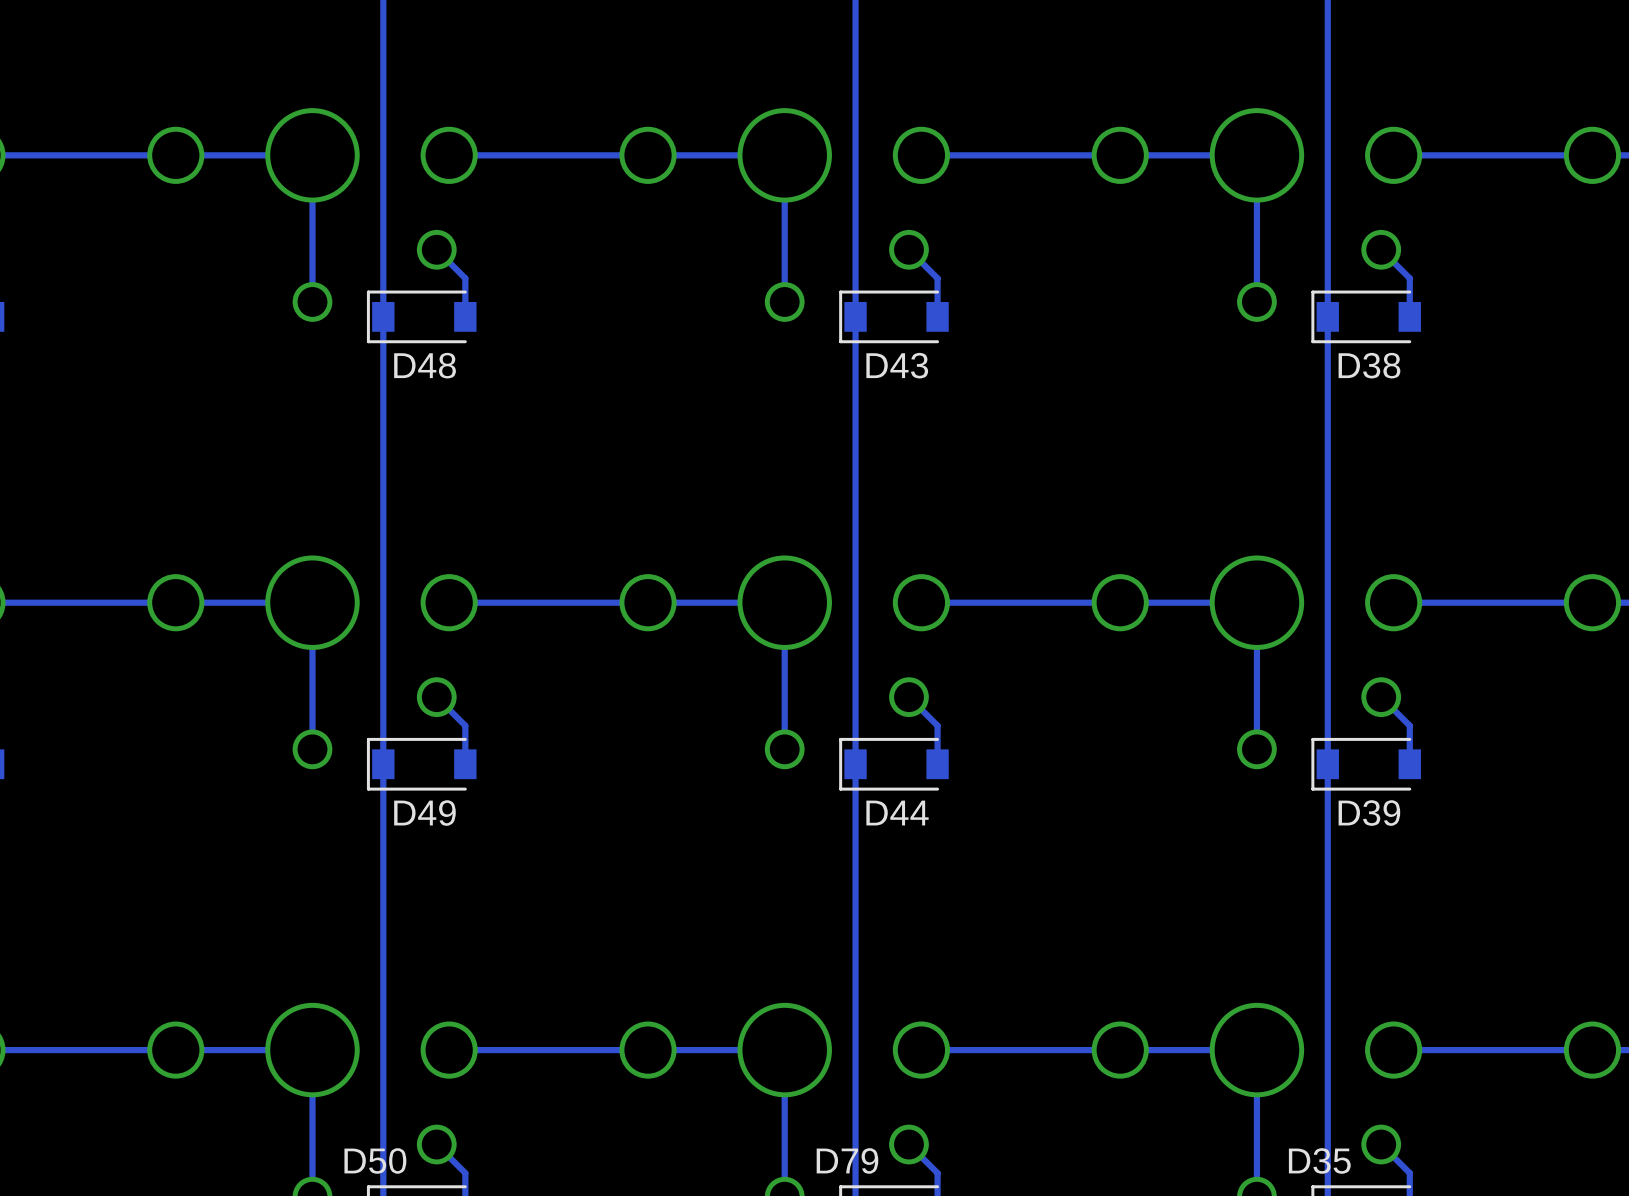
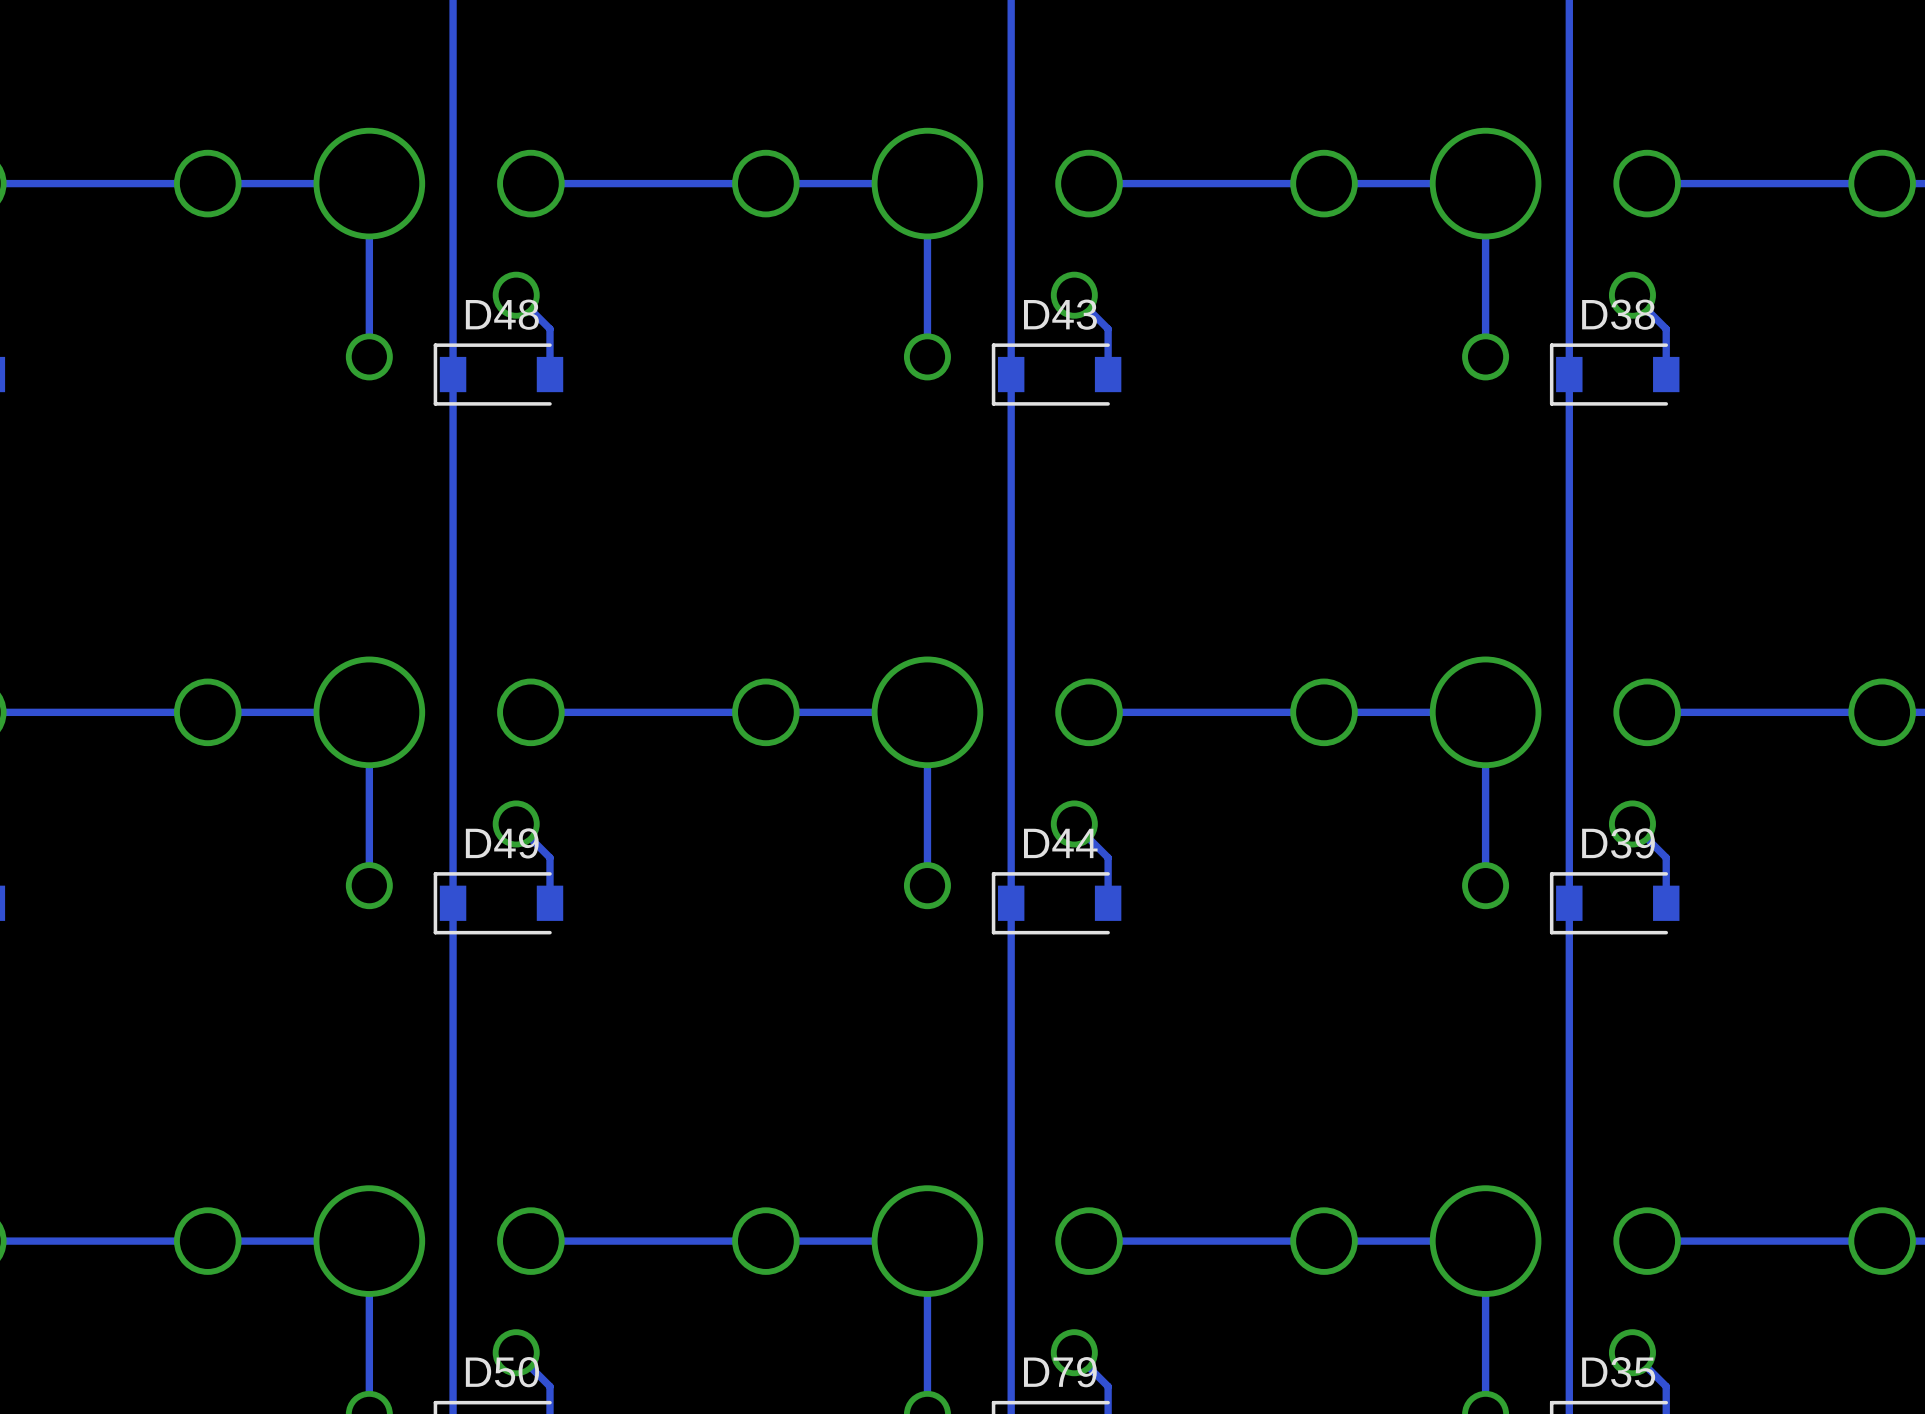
D48 name position: D48 (425, 365) -> D48 (502, 314)
D43 name position: D43 (897, 365) -> D43 (1060, 314)
D38 name position: D38 (1369, 365) -> D38 (1618, 314)
D49 name position: D49 (424, 813) -> D49 (502, 843)
D44 name position: D44 (897, 813) -> D44 (1060, 843)
D39 name position: D39 (1369, 813) -> D39 (1618, 843)
D50 name position: D50 (375, 1160) -> D50 (502, 1372)
D79 name position: D79 (847, 1160) -> D79 (1060, 1372)
D35 name position: D35 (1319, 1160) -> D35 (1618, 1372)

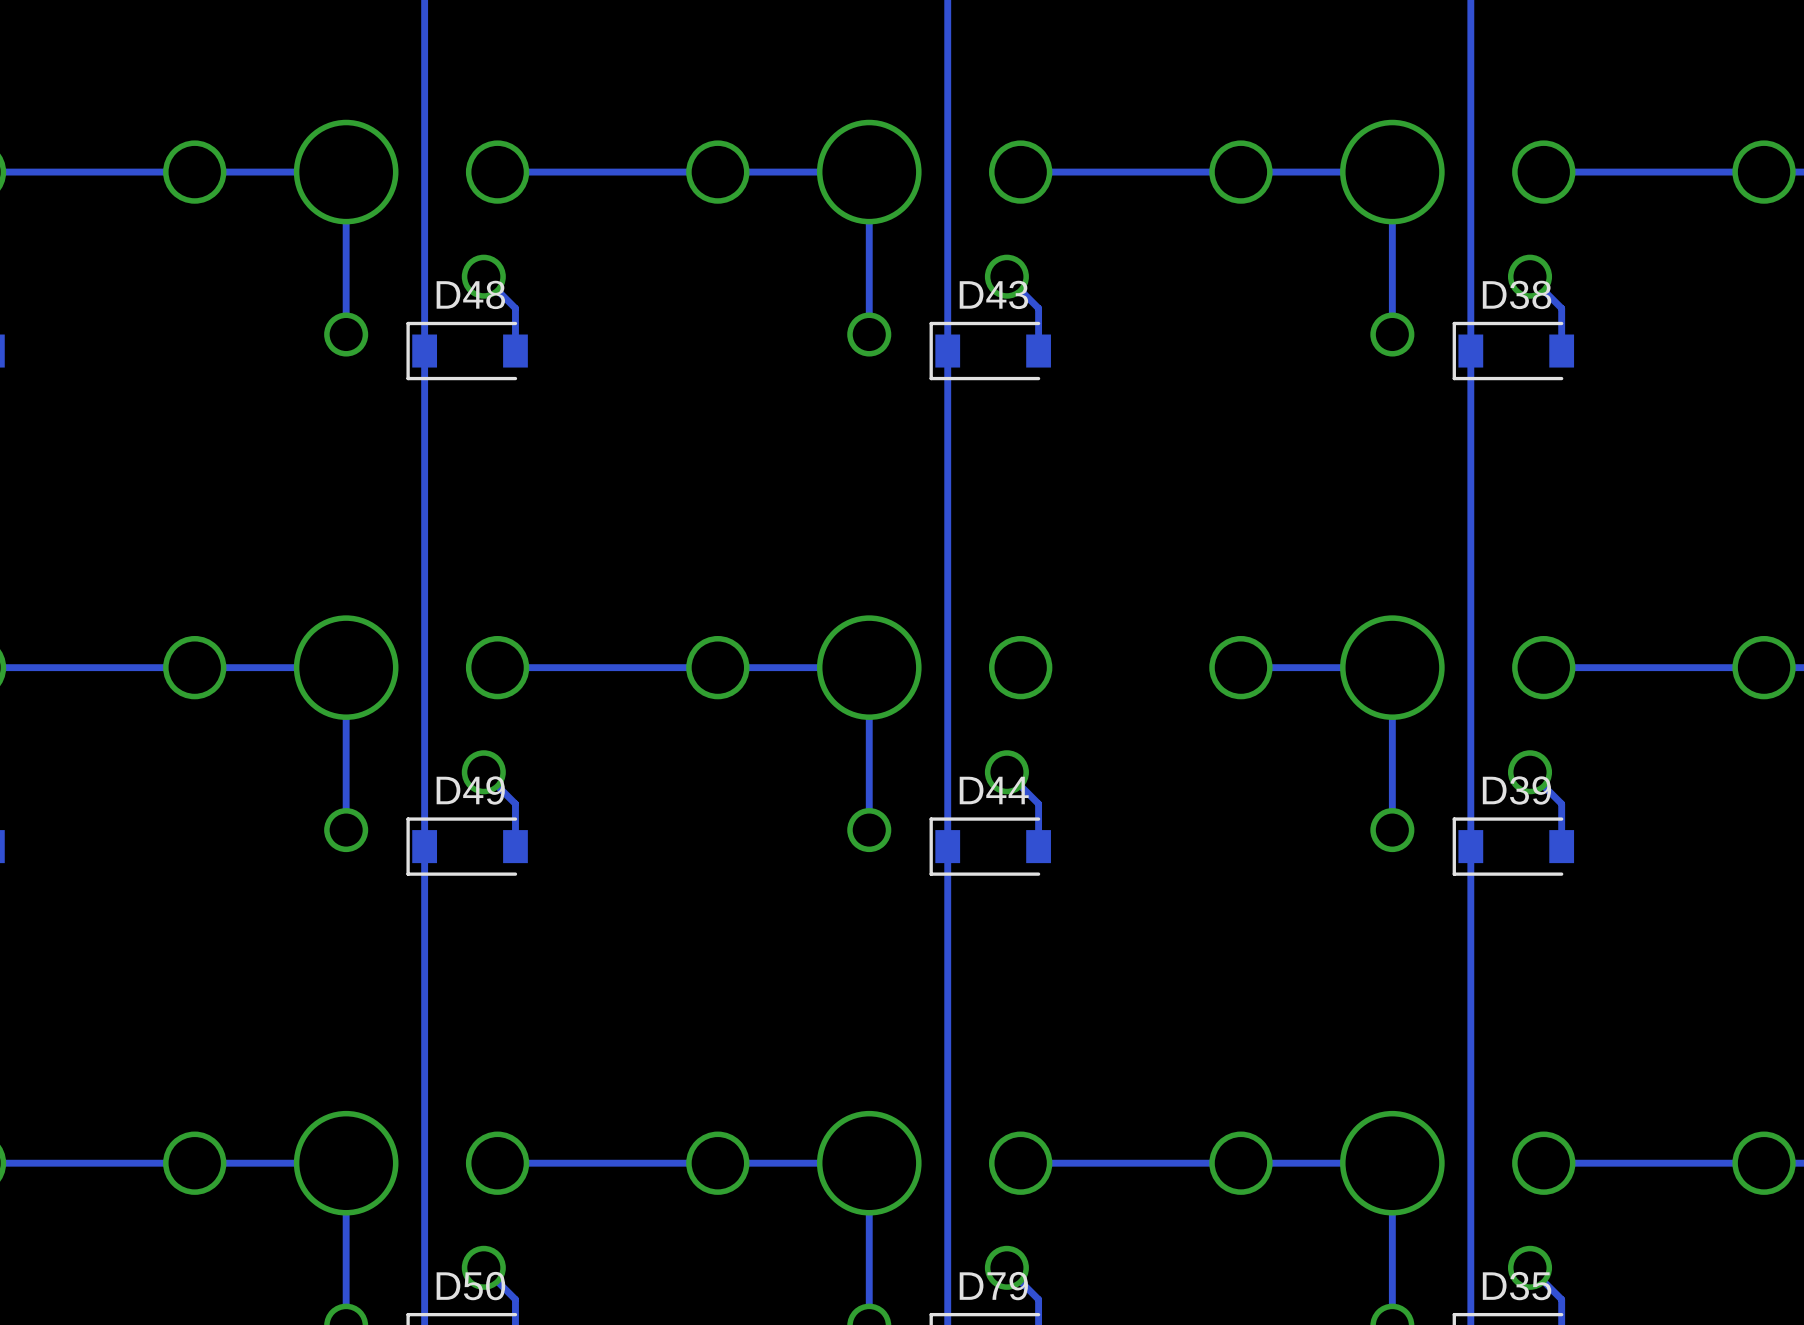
track: (1324, 712) (1089, 712) -> none

